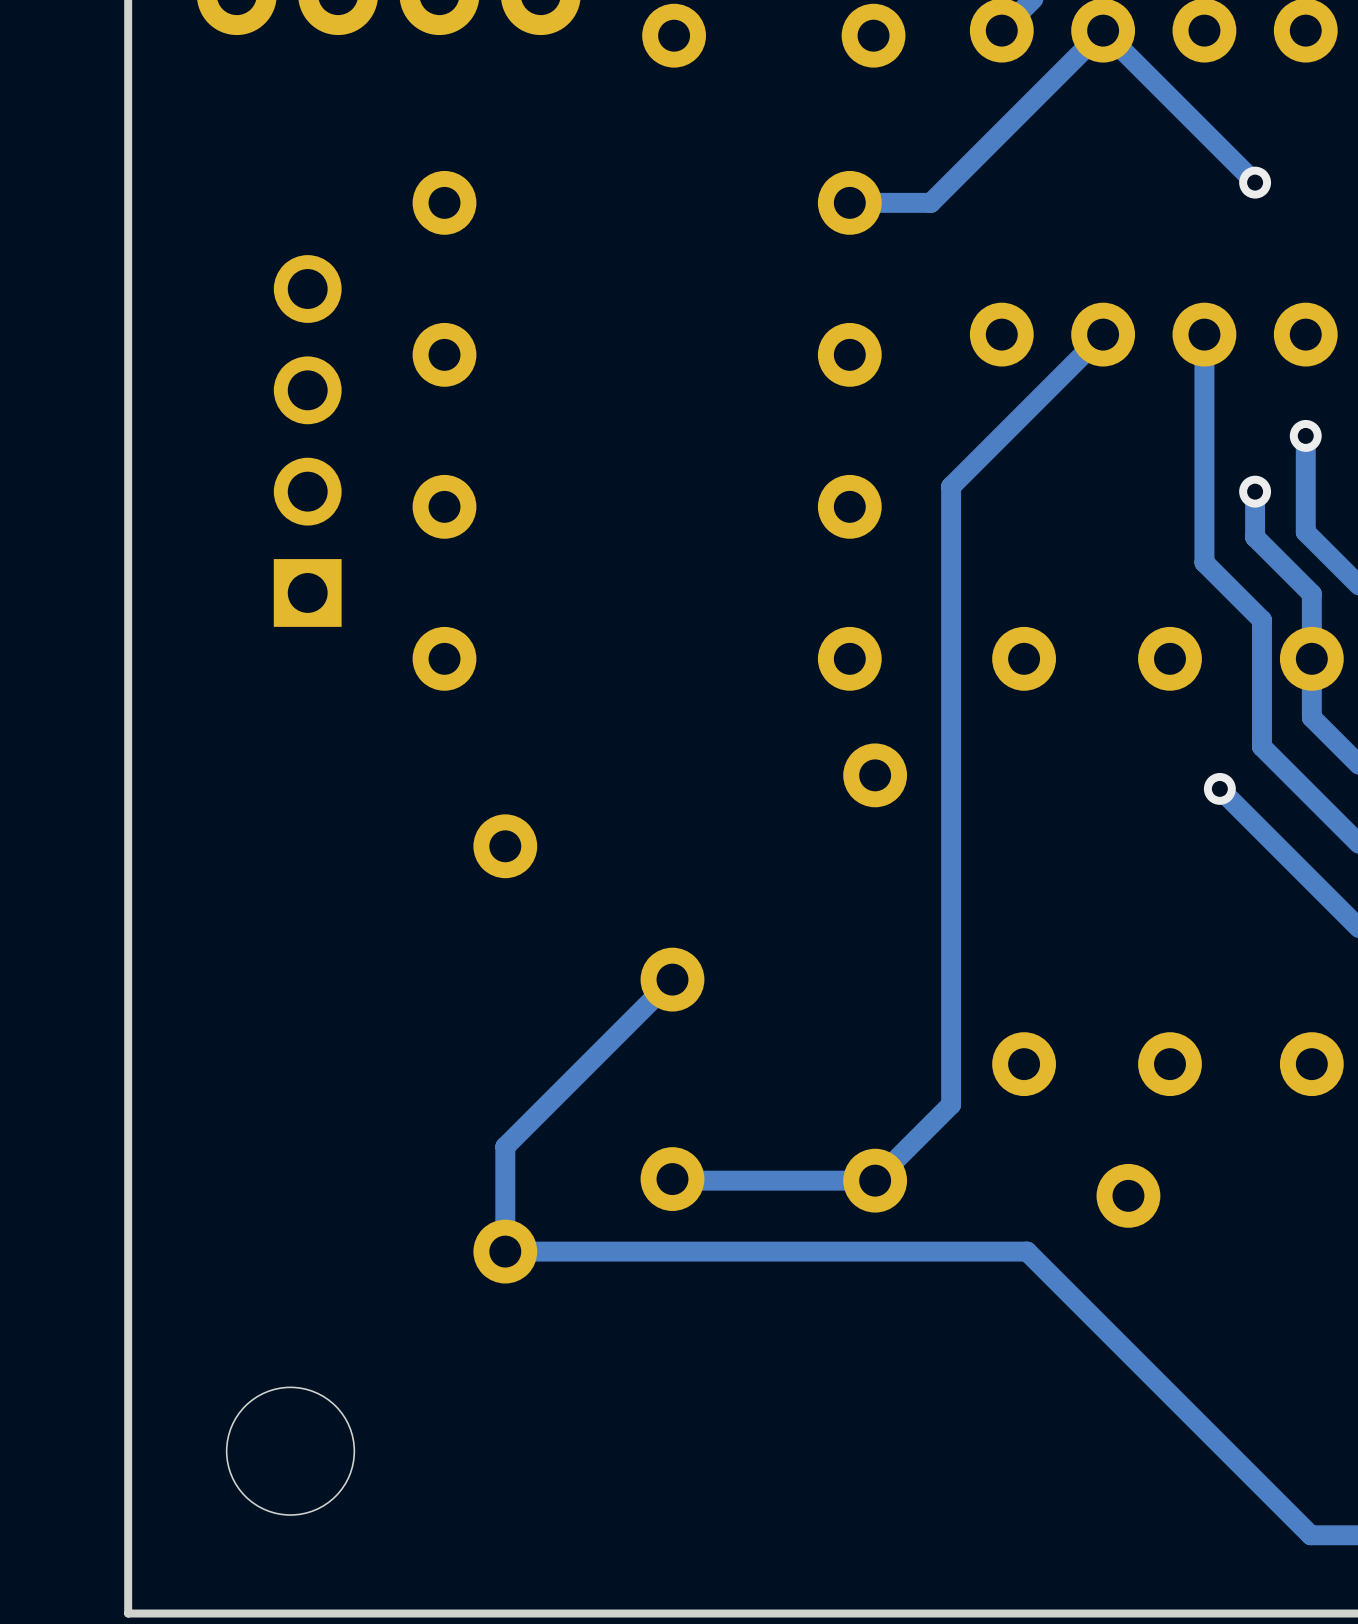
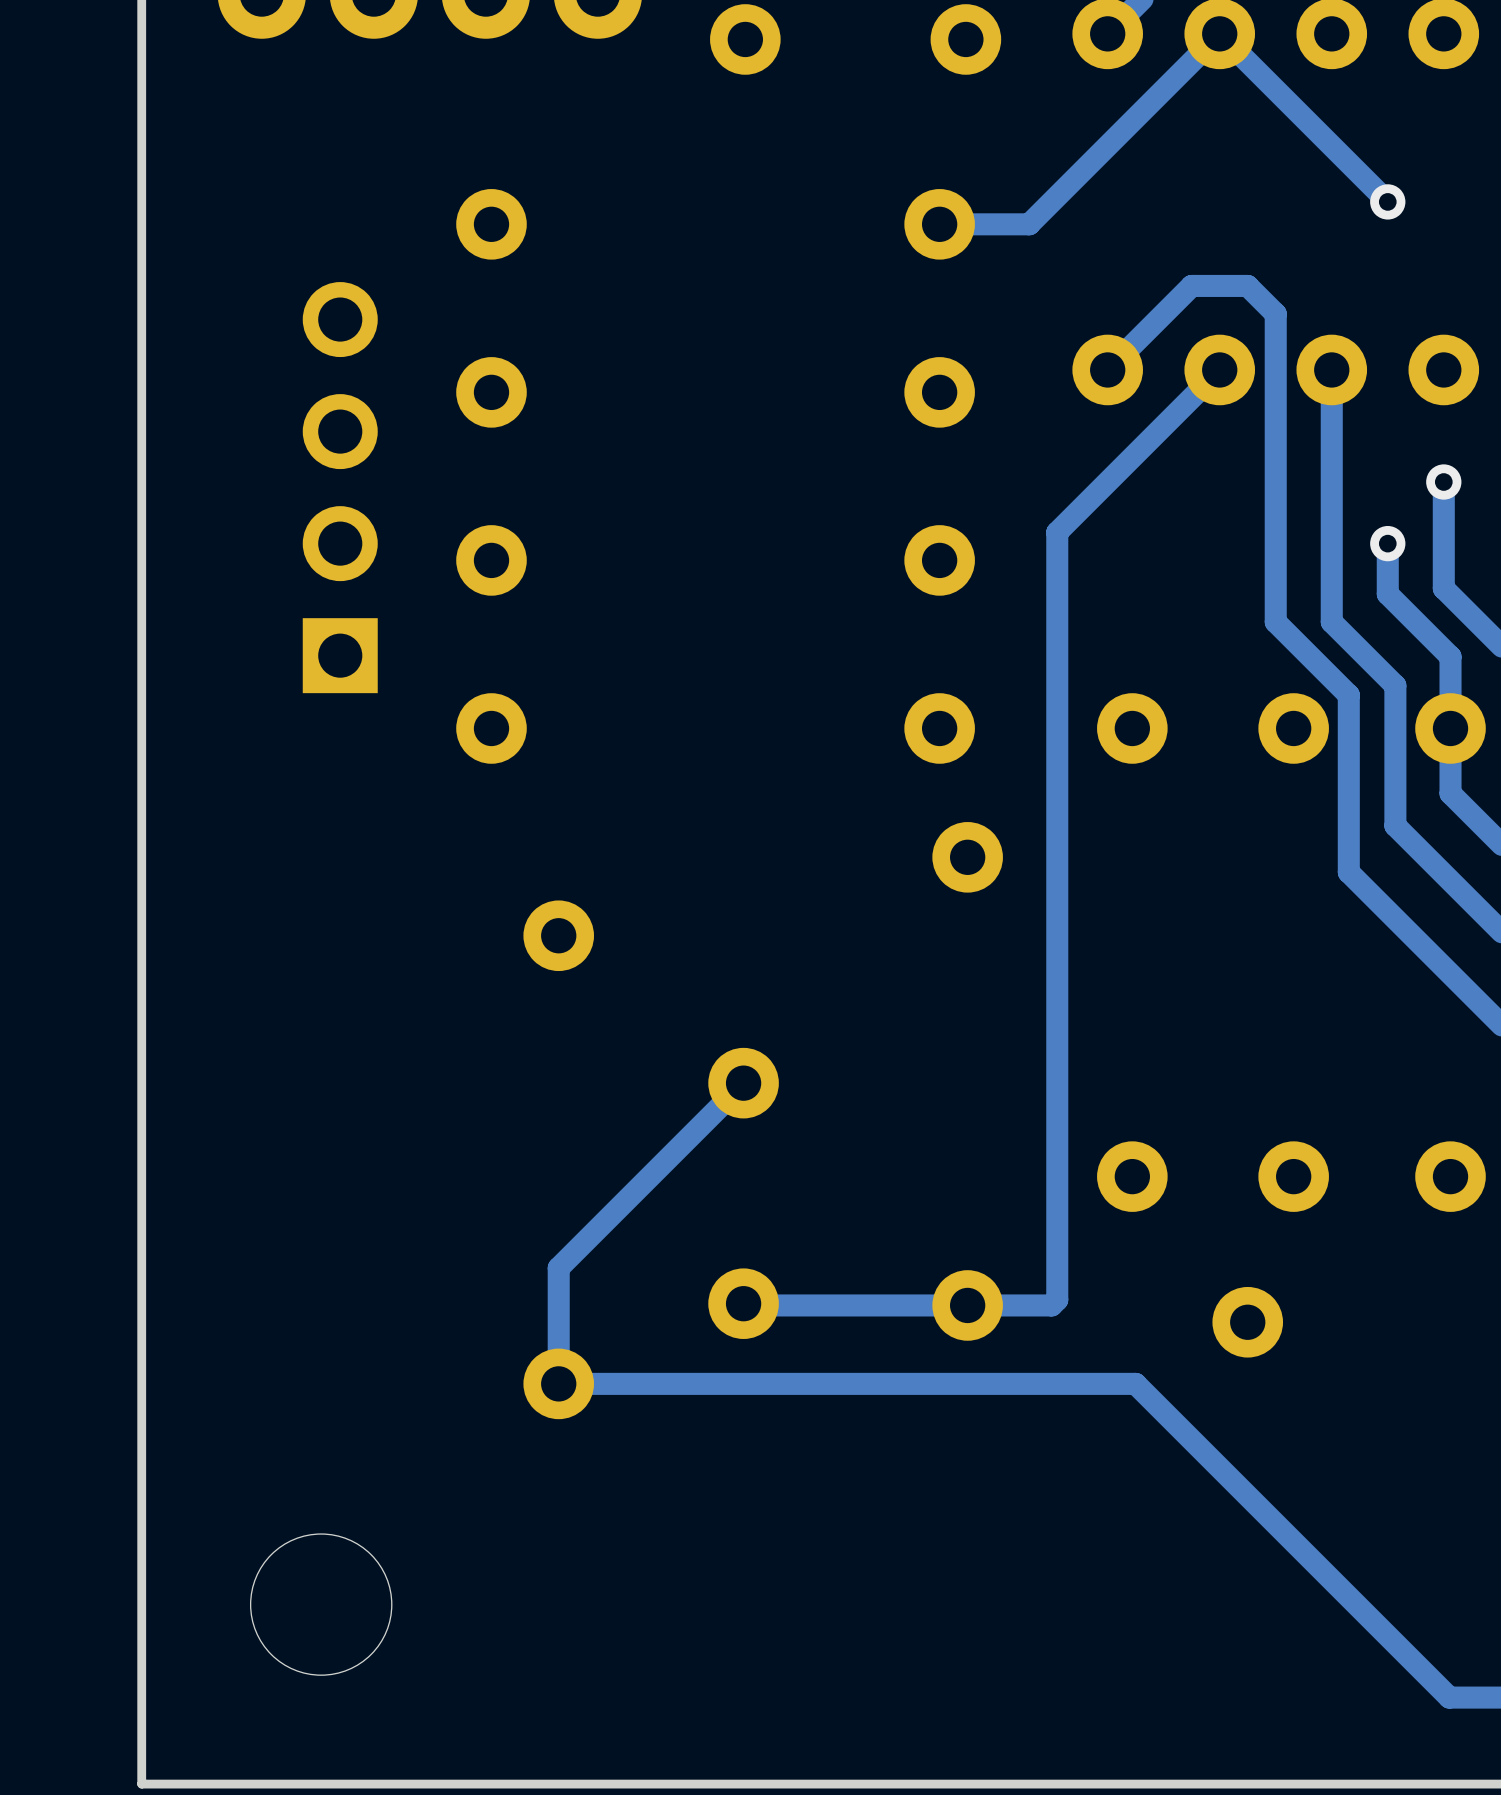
track: none -> (1107, 369) (1191, 285) (1247, 285) (1275, 313) (1275, 622) (1348, 695) (1348, 872)
track: (956, 481) (951, 486) (951, 1104) (875, 1180) -> (1057, 532) (1057, 1299) (1051, 1305) (967, 1305)
via: (1219, 788) -> none

